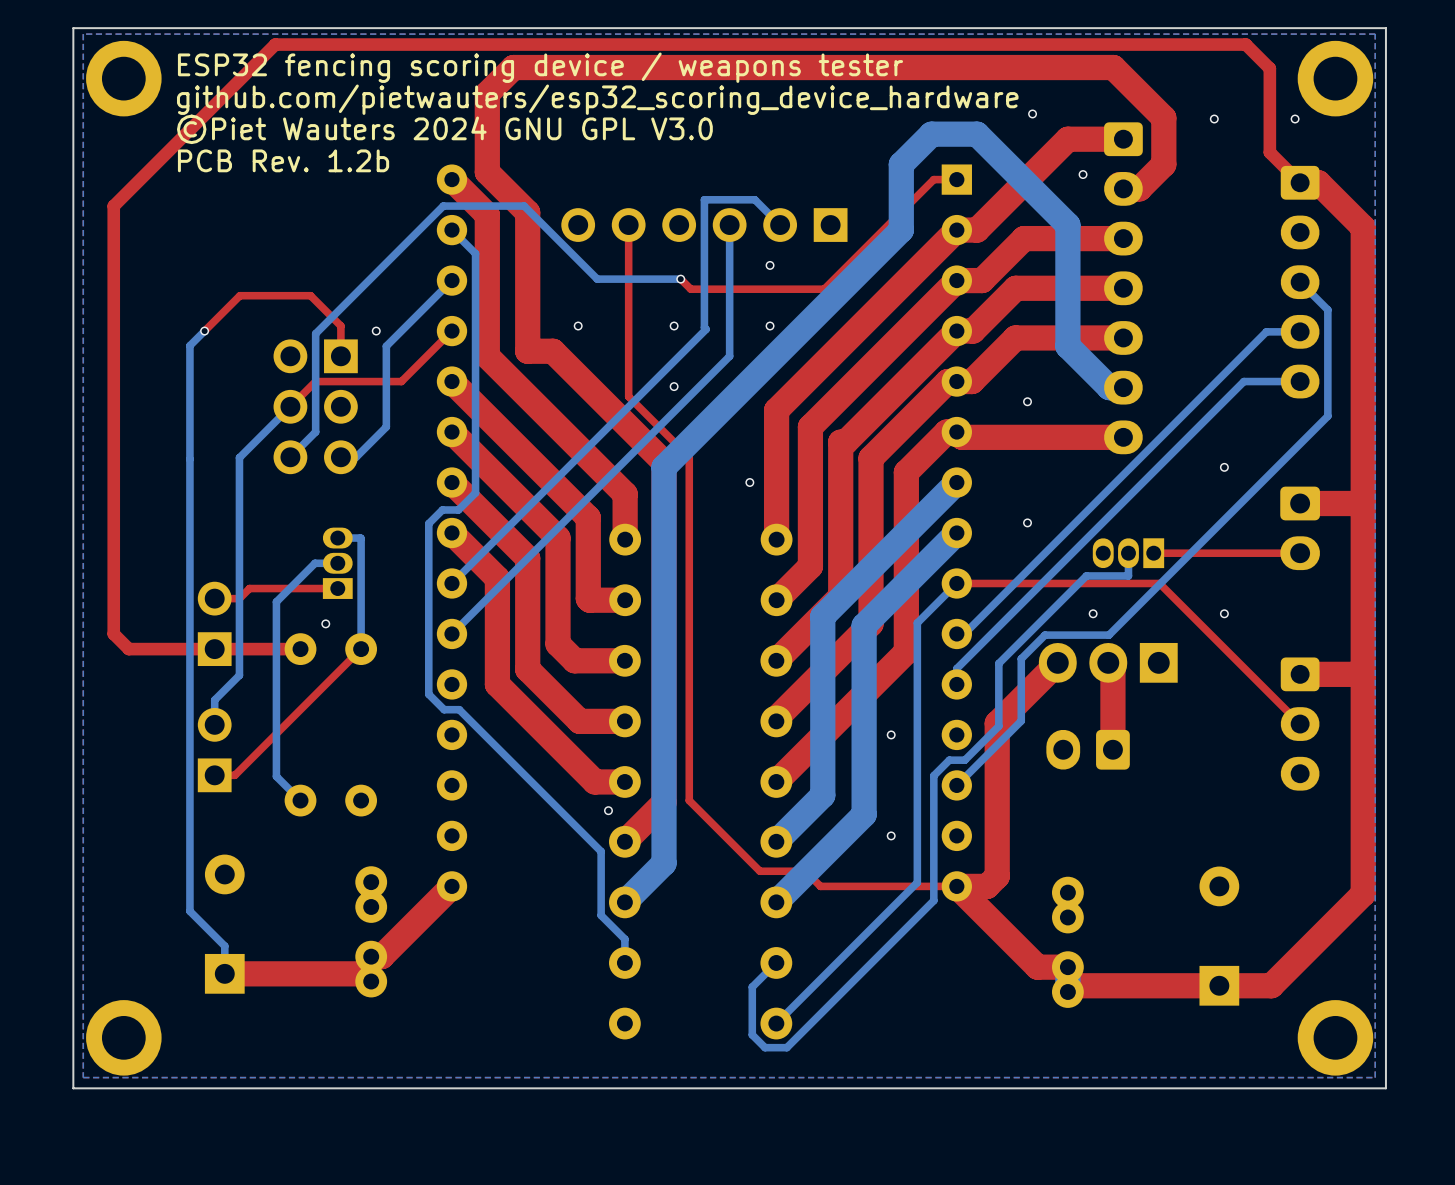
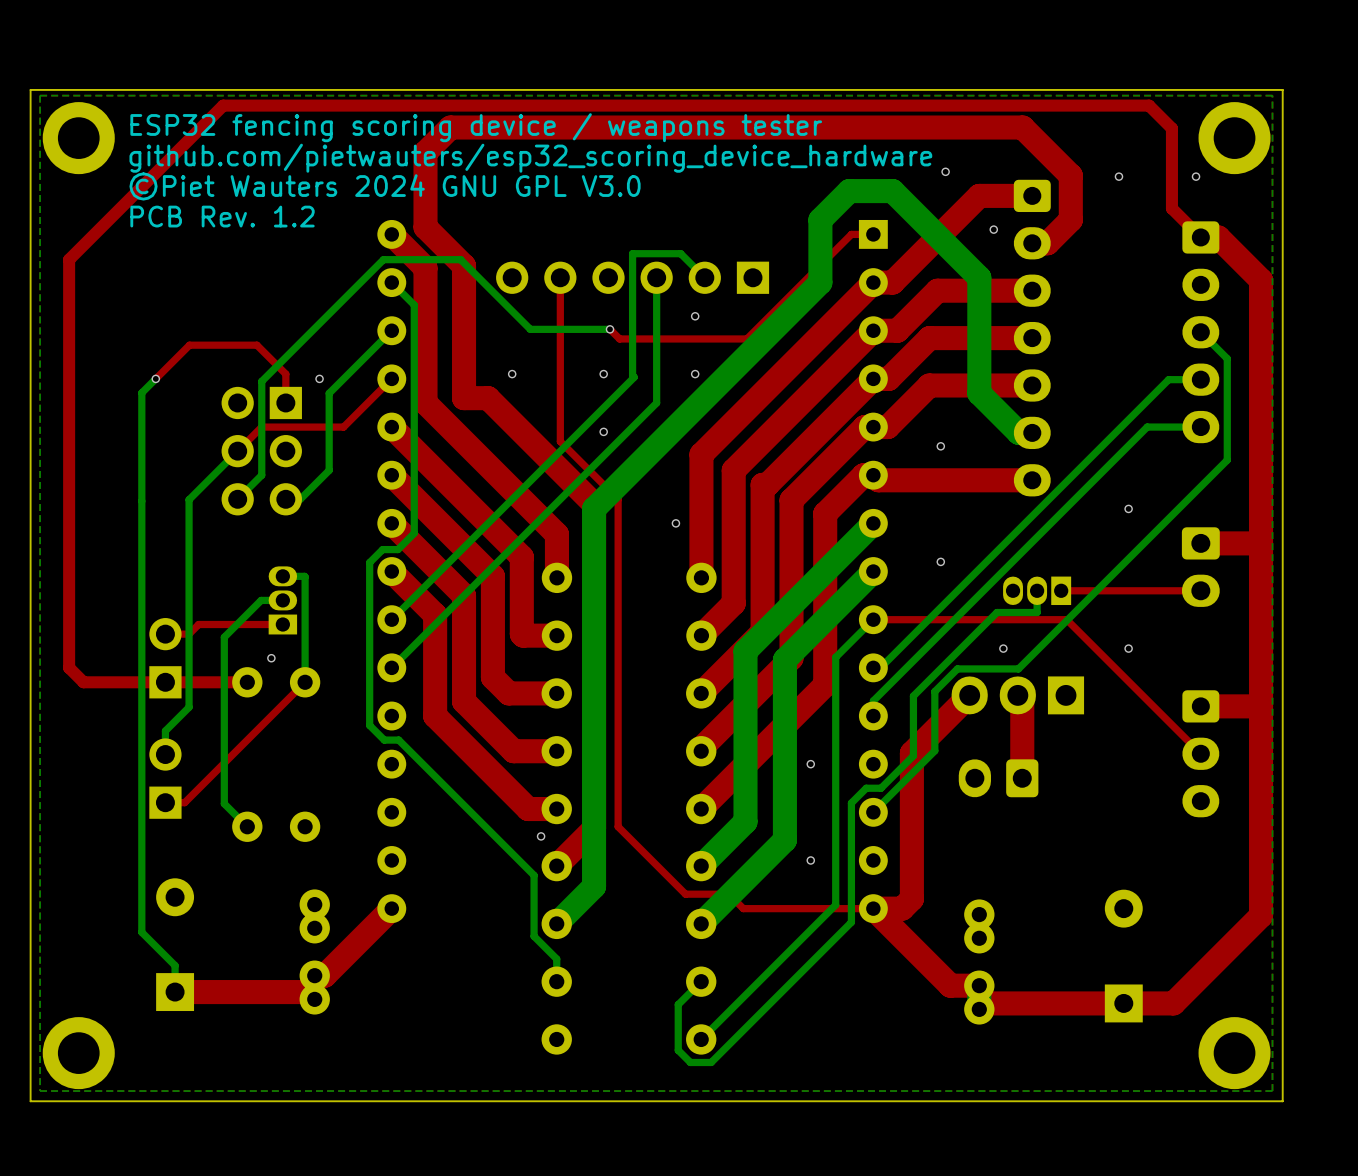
text: PCB Rev. 1.2b (283, 160) -> PCB Rev. 1.2 (222, 216)

